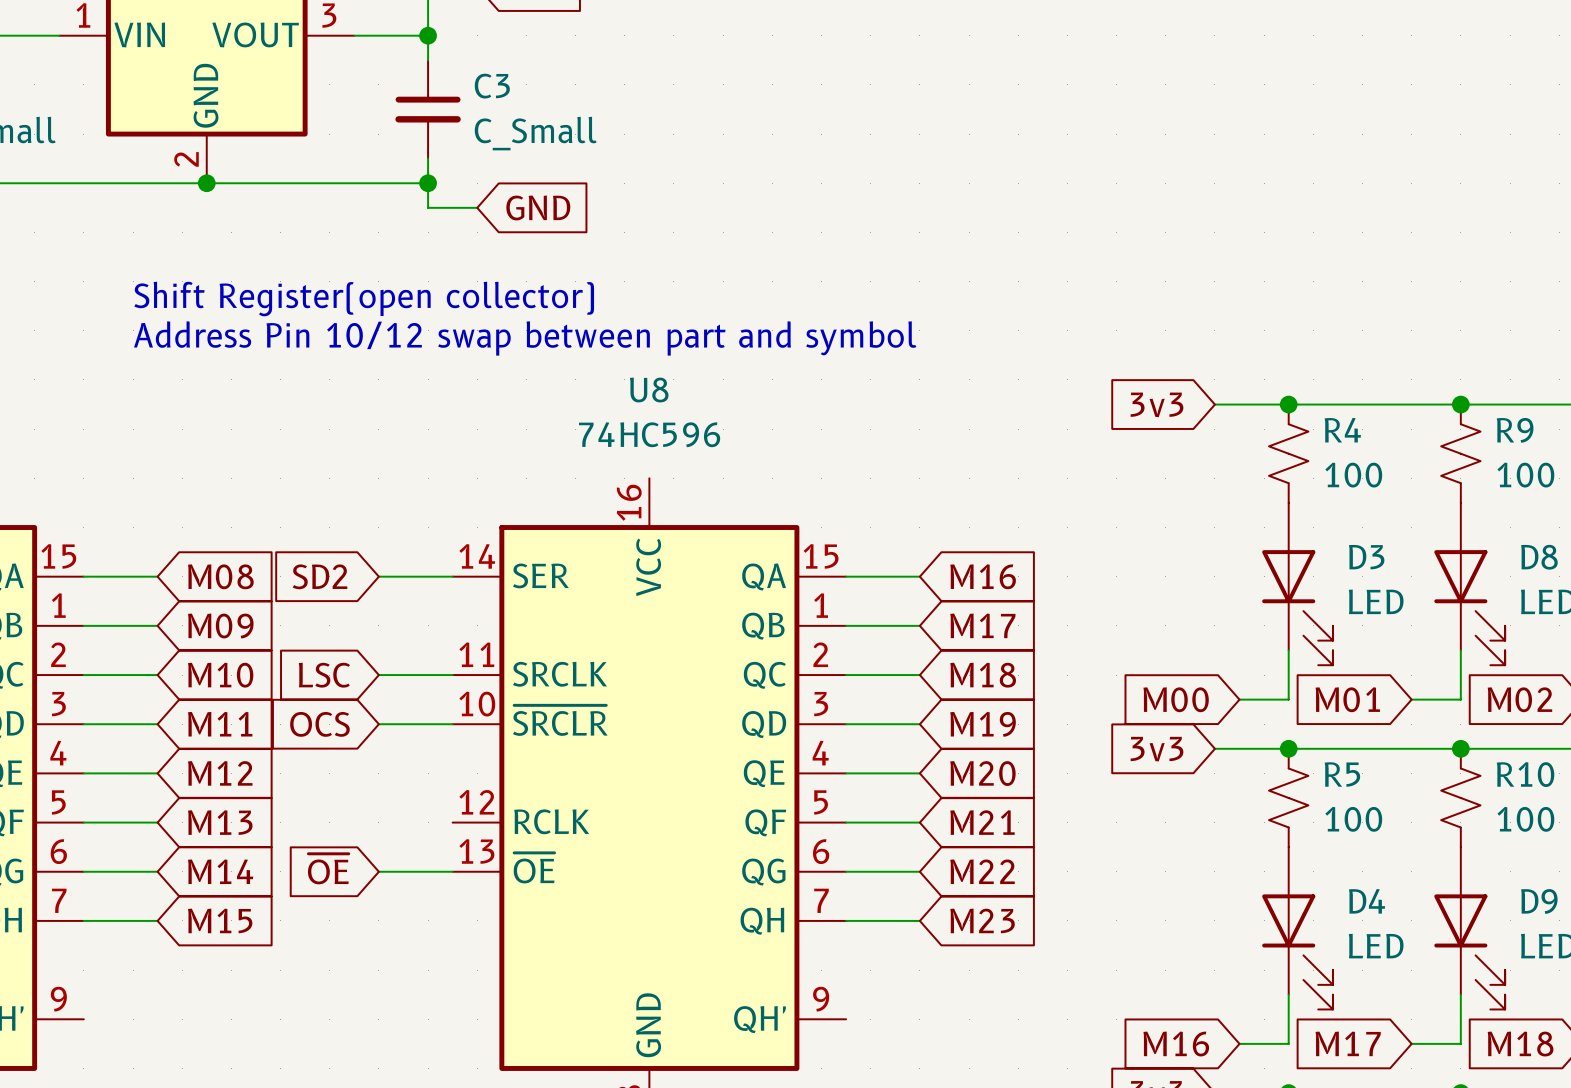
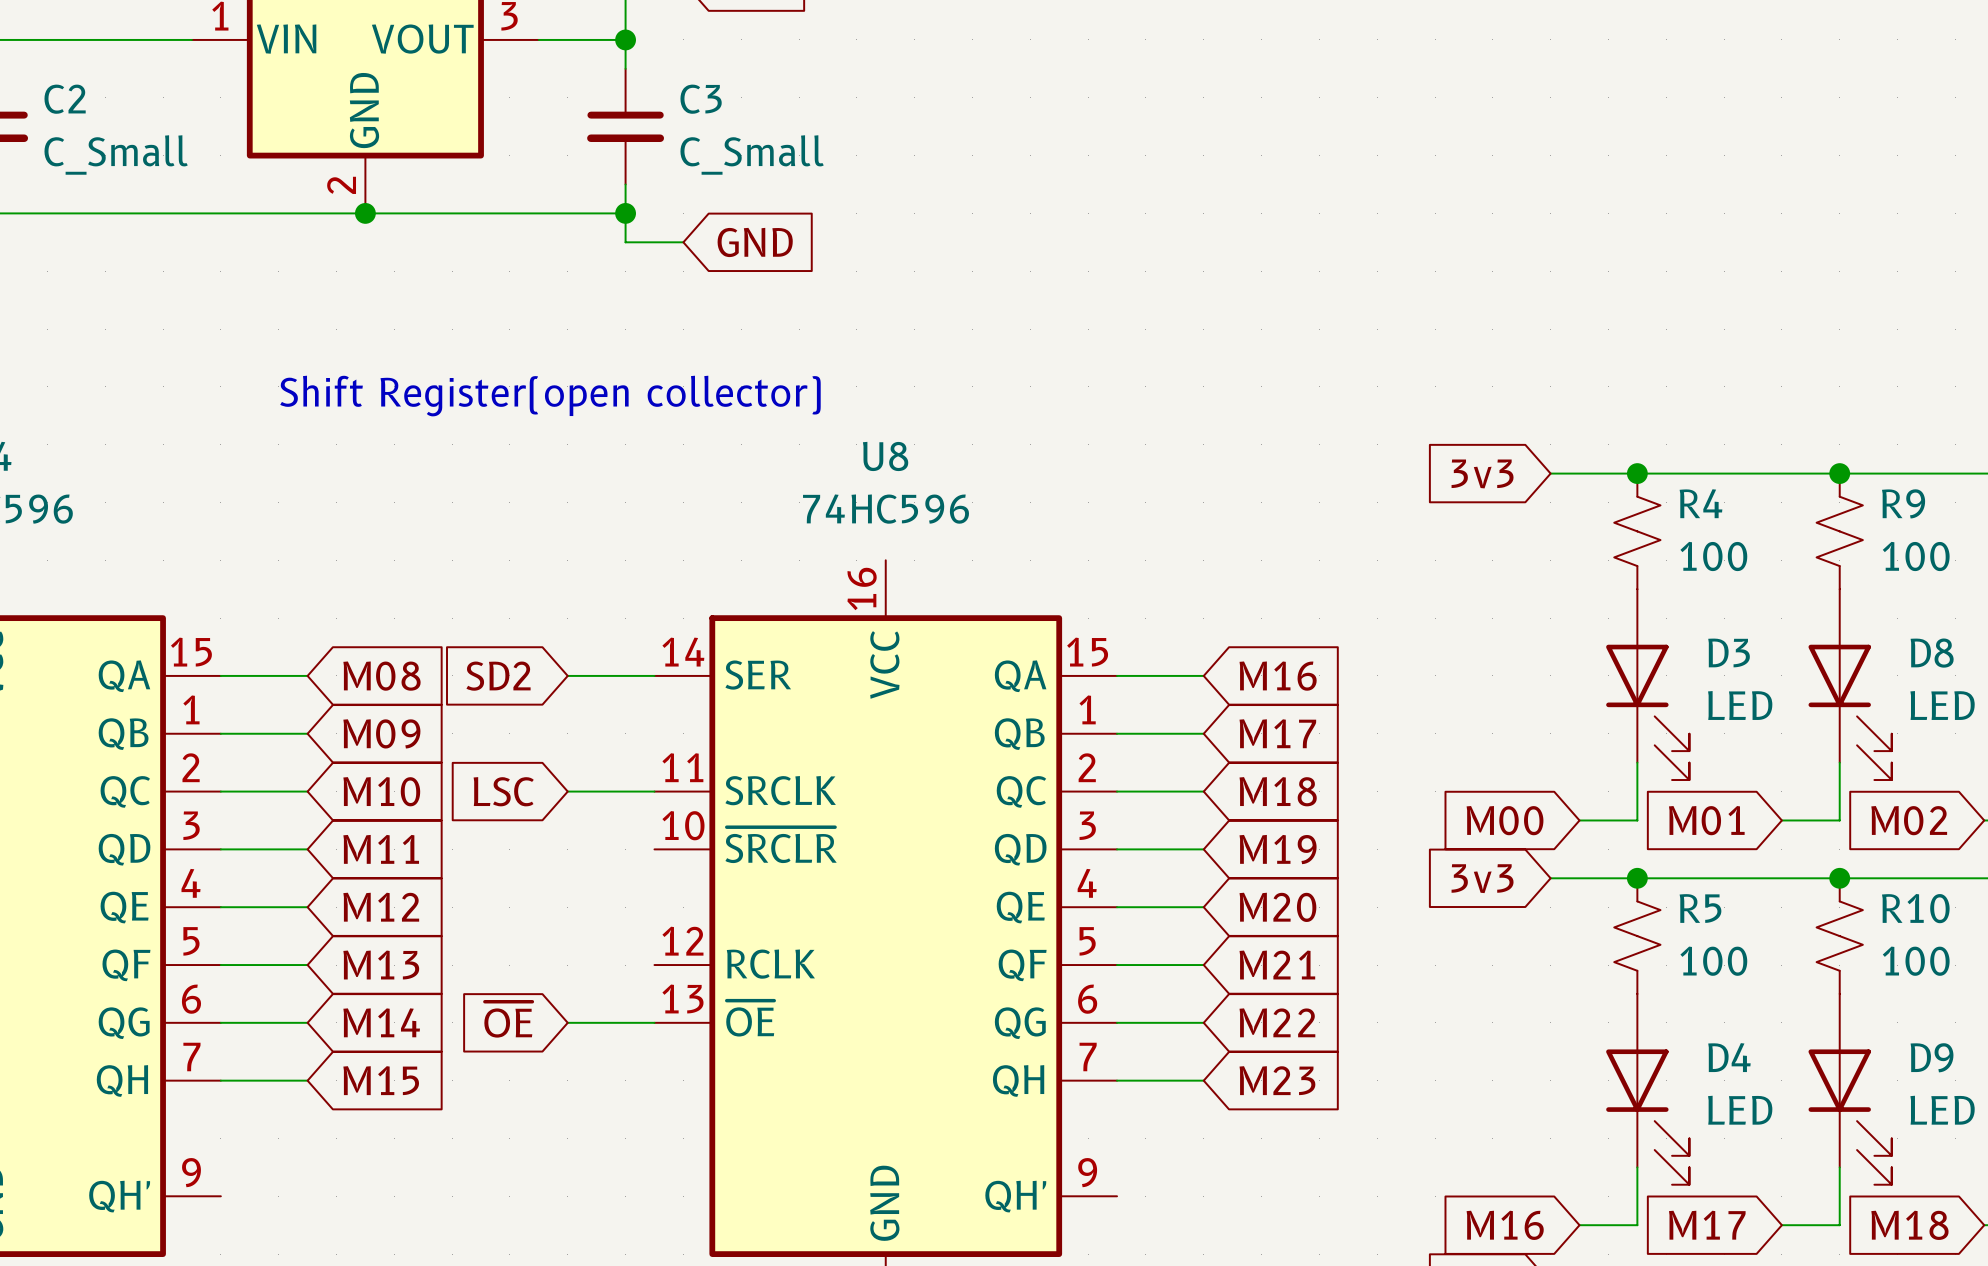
text: Shift Register(open collector) (364, 299) -> none
text: Address Pin 10/12 swap between part and symbol (525, 338) -> Shift Register(open collector) (550, 396)
global label: OCS (319, 724) -> none
wire: (378, 724) (452, 724) -> none

